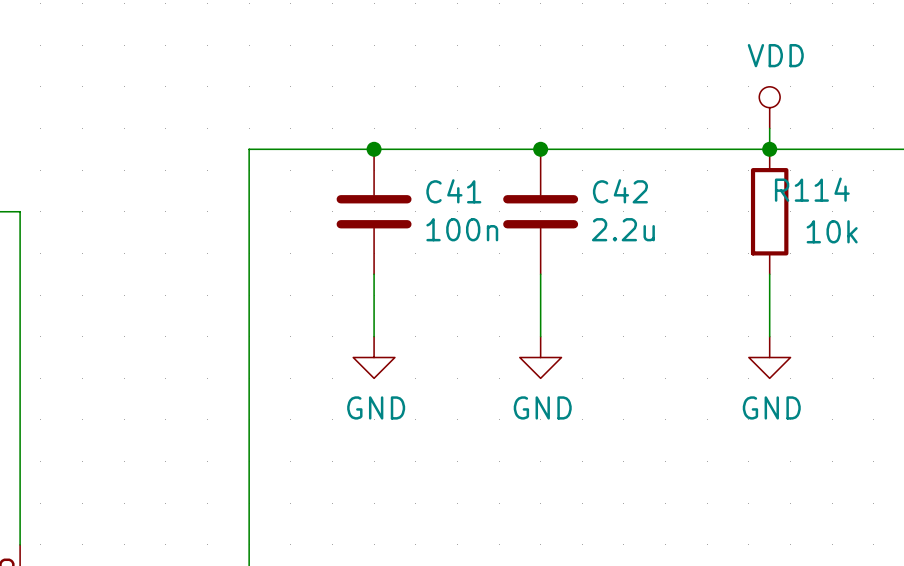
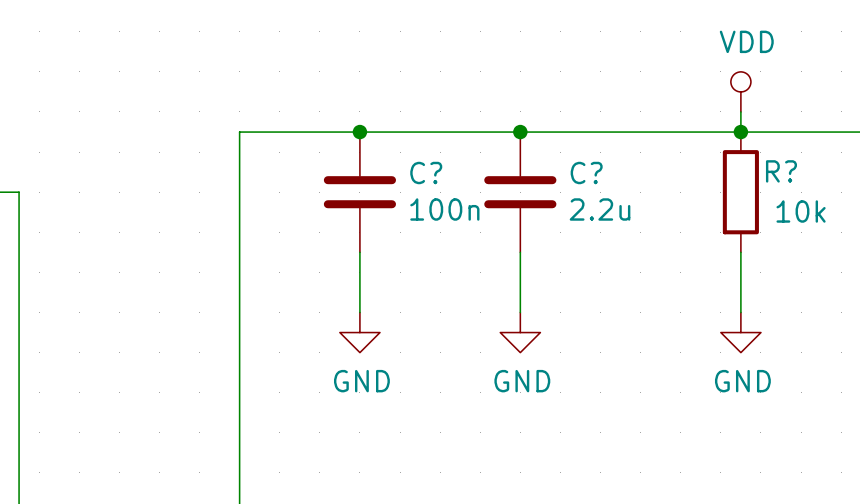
R114 name: R114 (812, 189) -> R? (781, 171)
C41 name: C41 (453, 191) -> C? (426, 173)
C42 name: C42 (620, 191) -> C? (586, 173)

